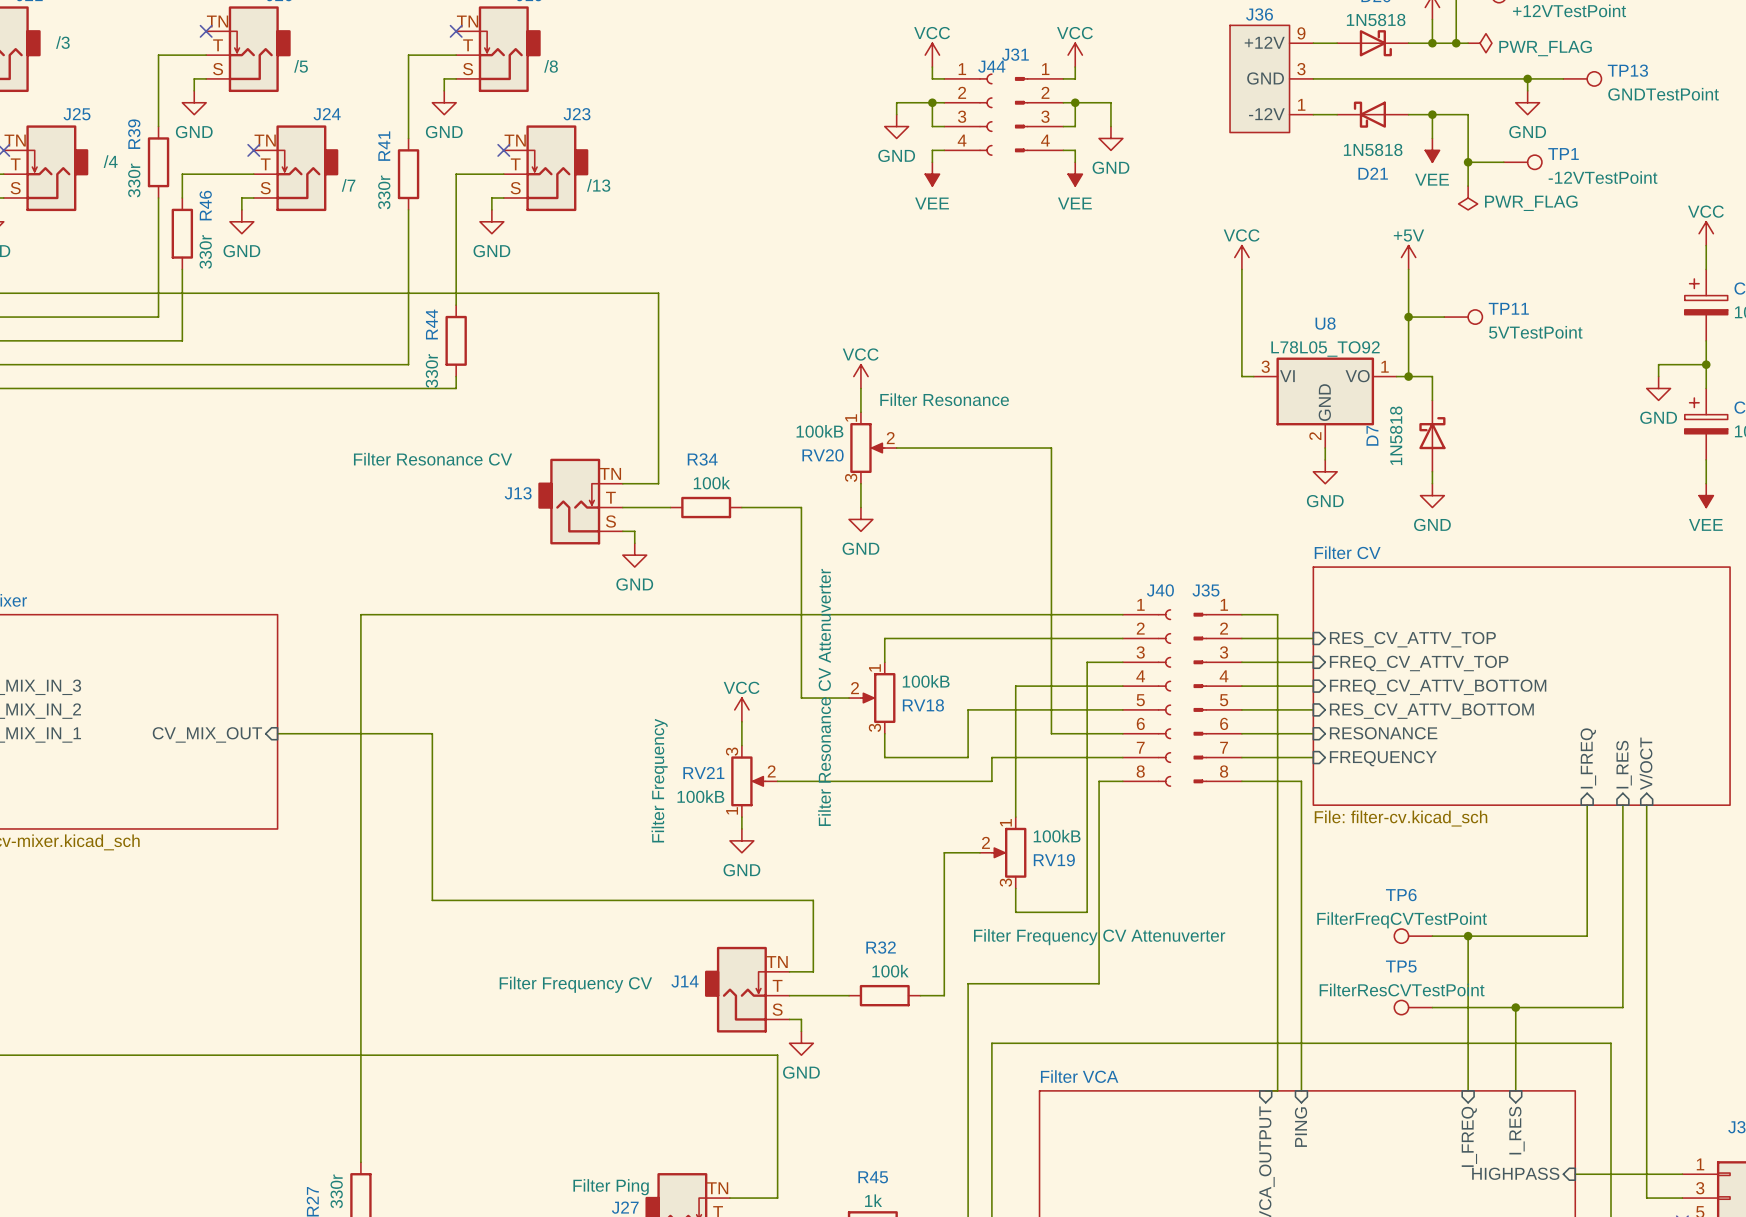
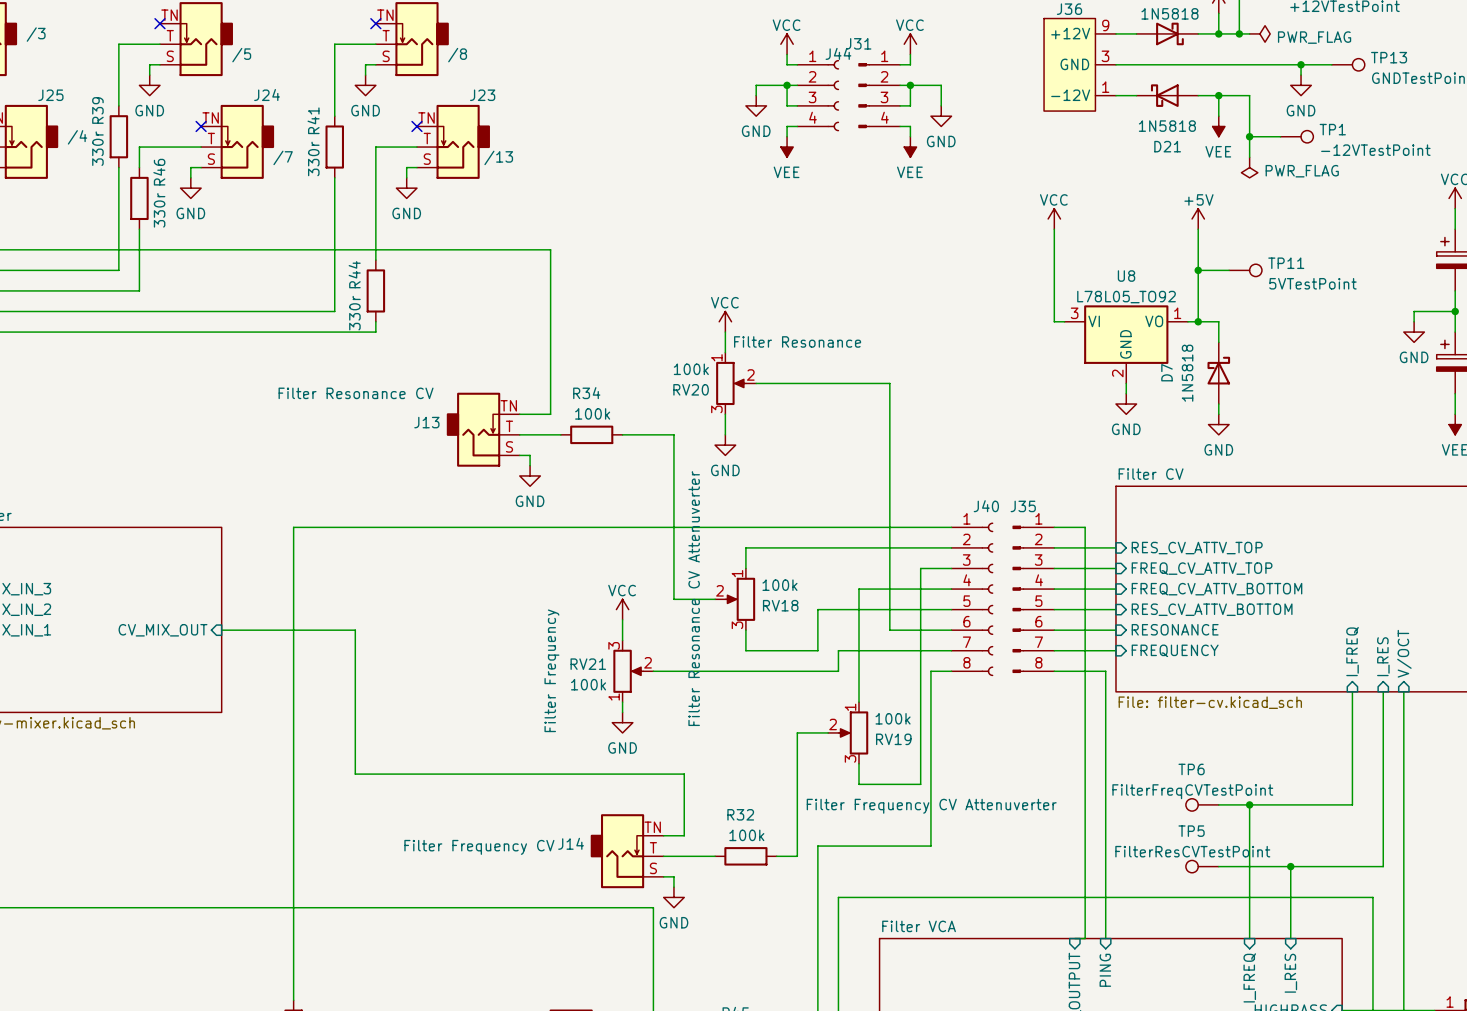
RV20 value: 100kB (819, 431) -> 100k (691, 369)
RV18 value: 100kB (926, 681) -> 100k (779, 585)
RV21 value: 100kB (700, 796) -> 100k (588, 684)
RV19 value: 100kB (1057, 836) -> 100k (893, 718)

